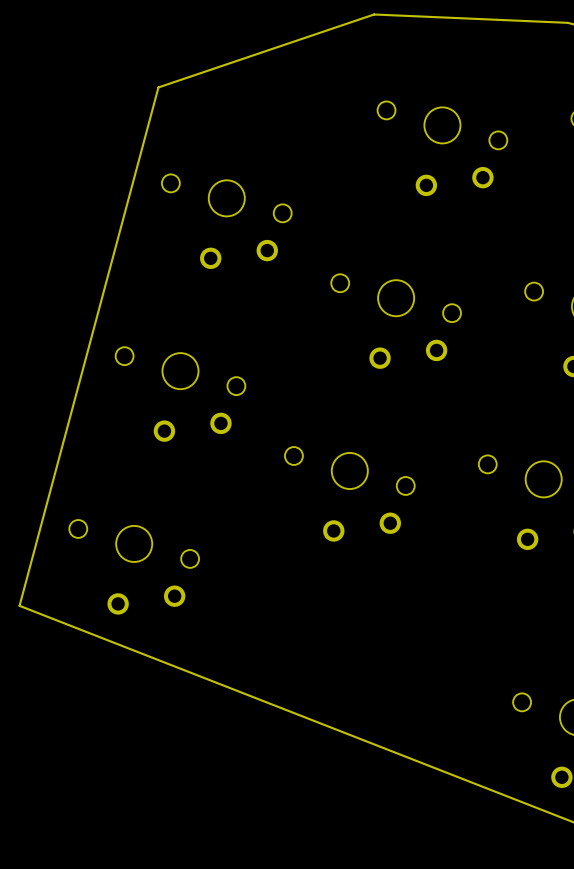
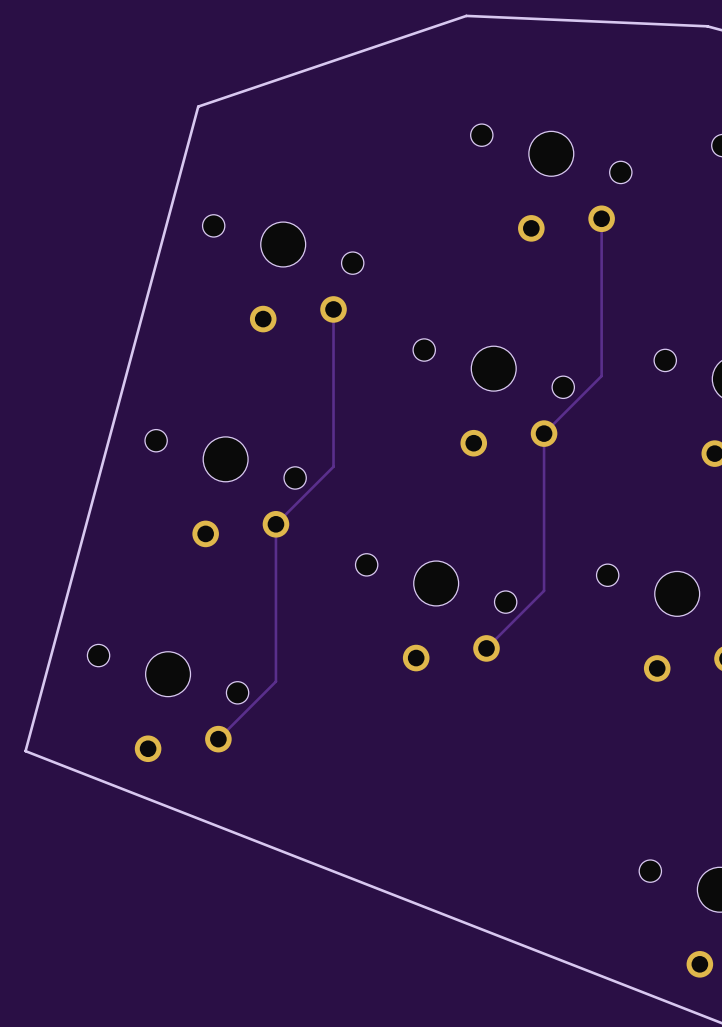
track: none -> (601, 218) (601, 376) (544, 433) (544, 590) (486, 648)
track: none -> (333, 309) (333, 466) (275, 524) (275, 681) (218, 739)

